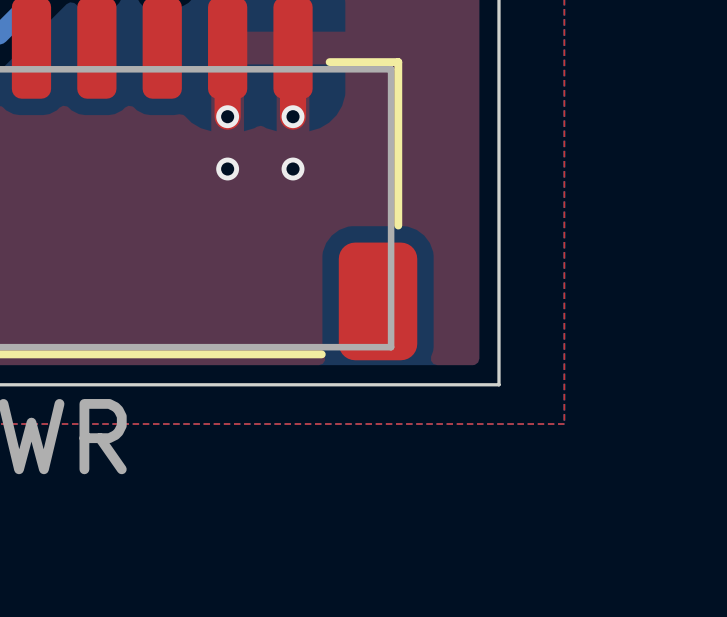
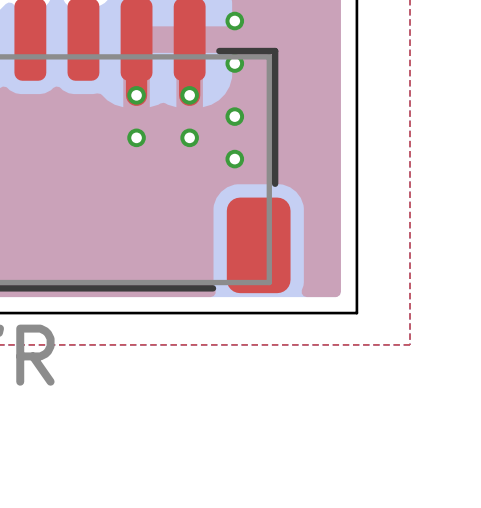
via: none -> (234, 21)
via: none -> (234, 63)
via: none -> (234, 116)
via: none -> (234, 159)

